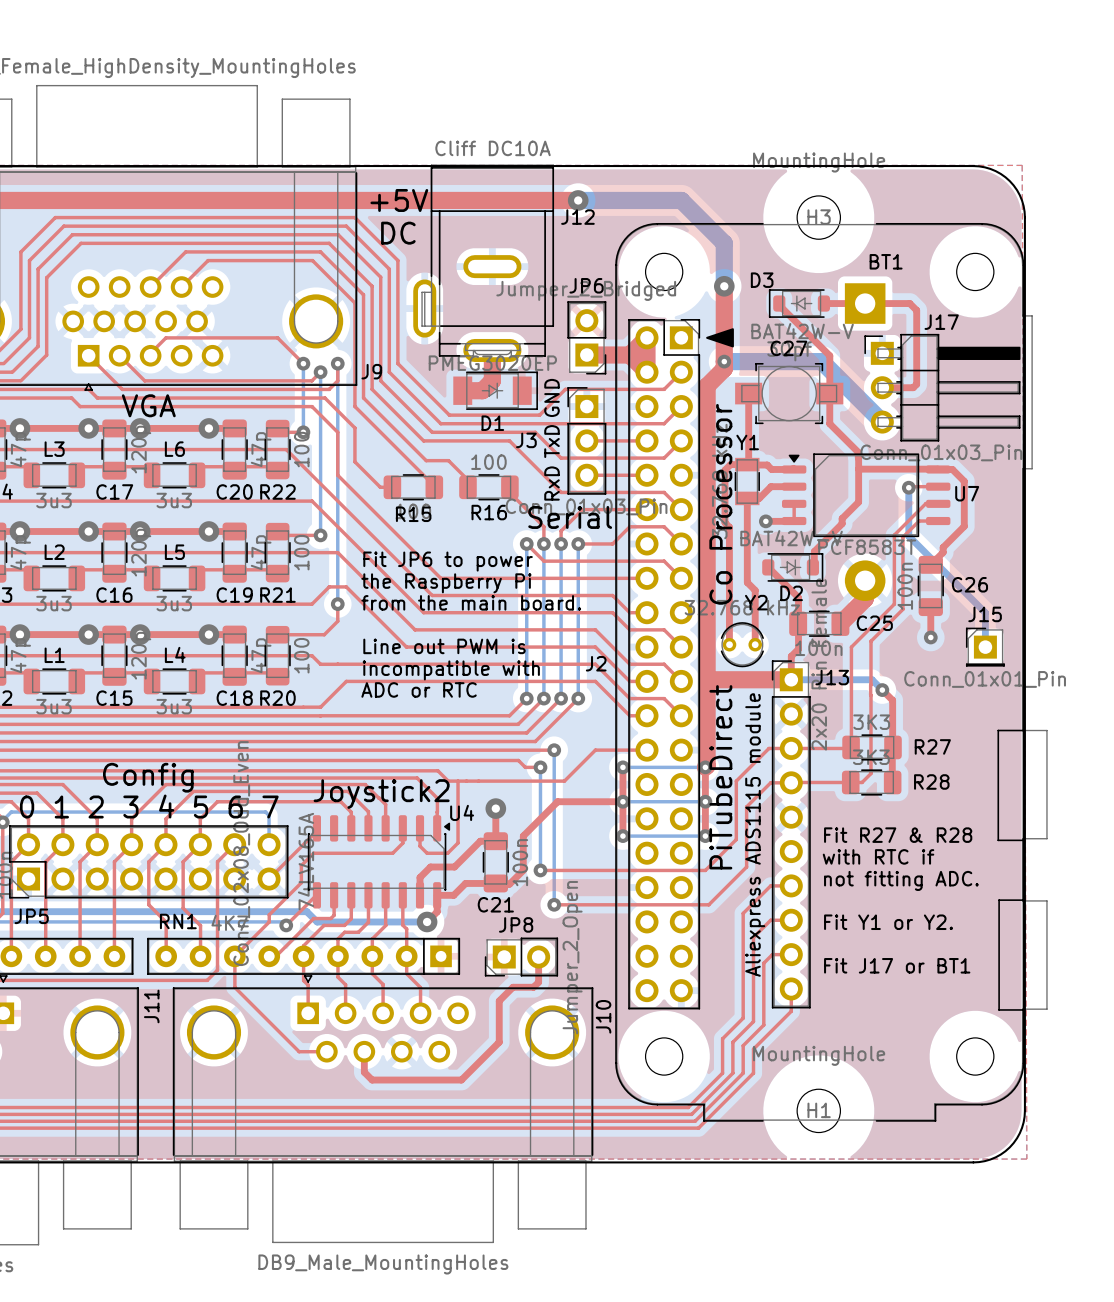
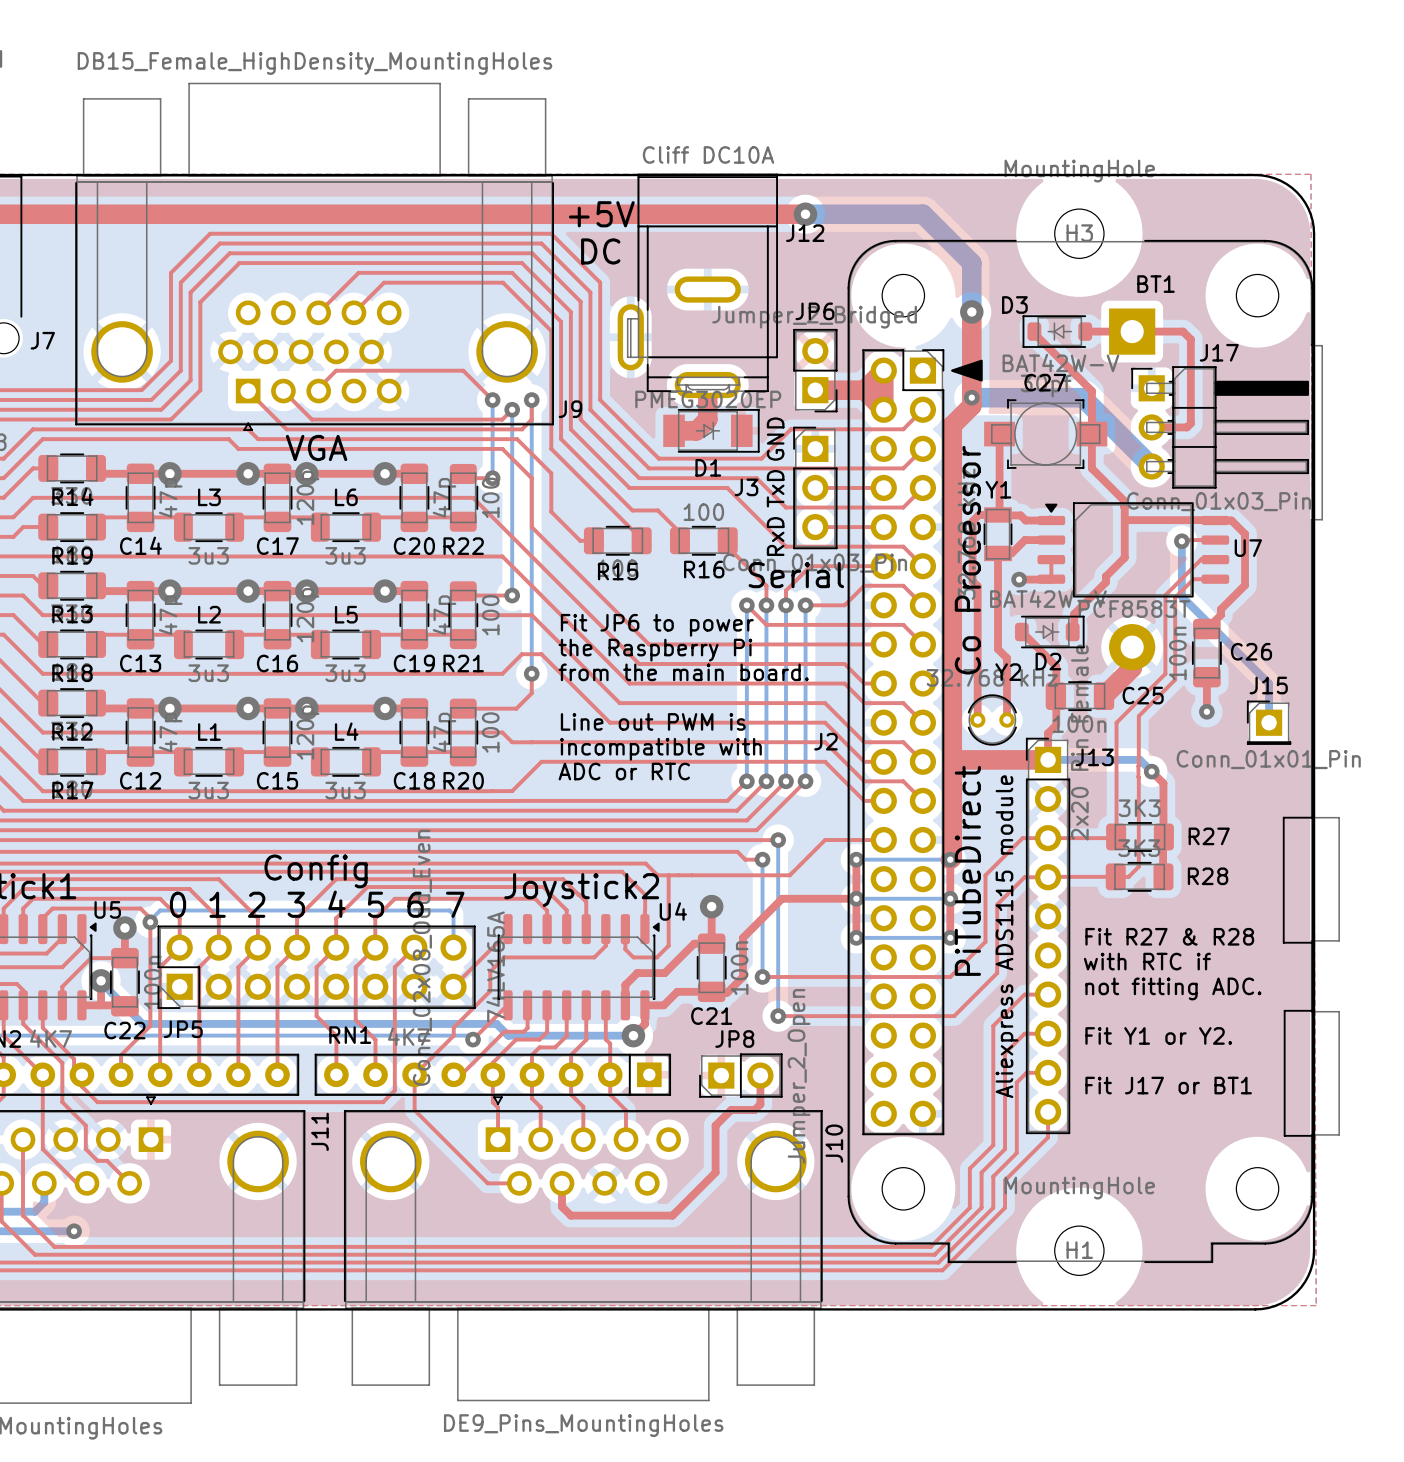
J10 value: DB9_Male_MountingHoles (383, 1264) -> DE9_Pins_MountingHoles (583, 1425)

